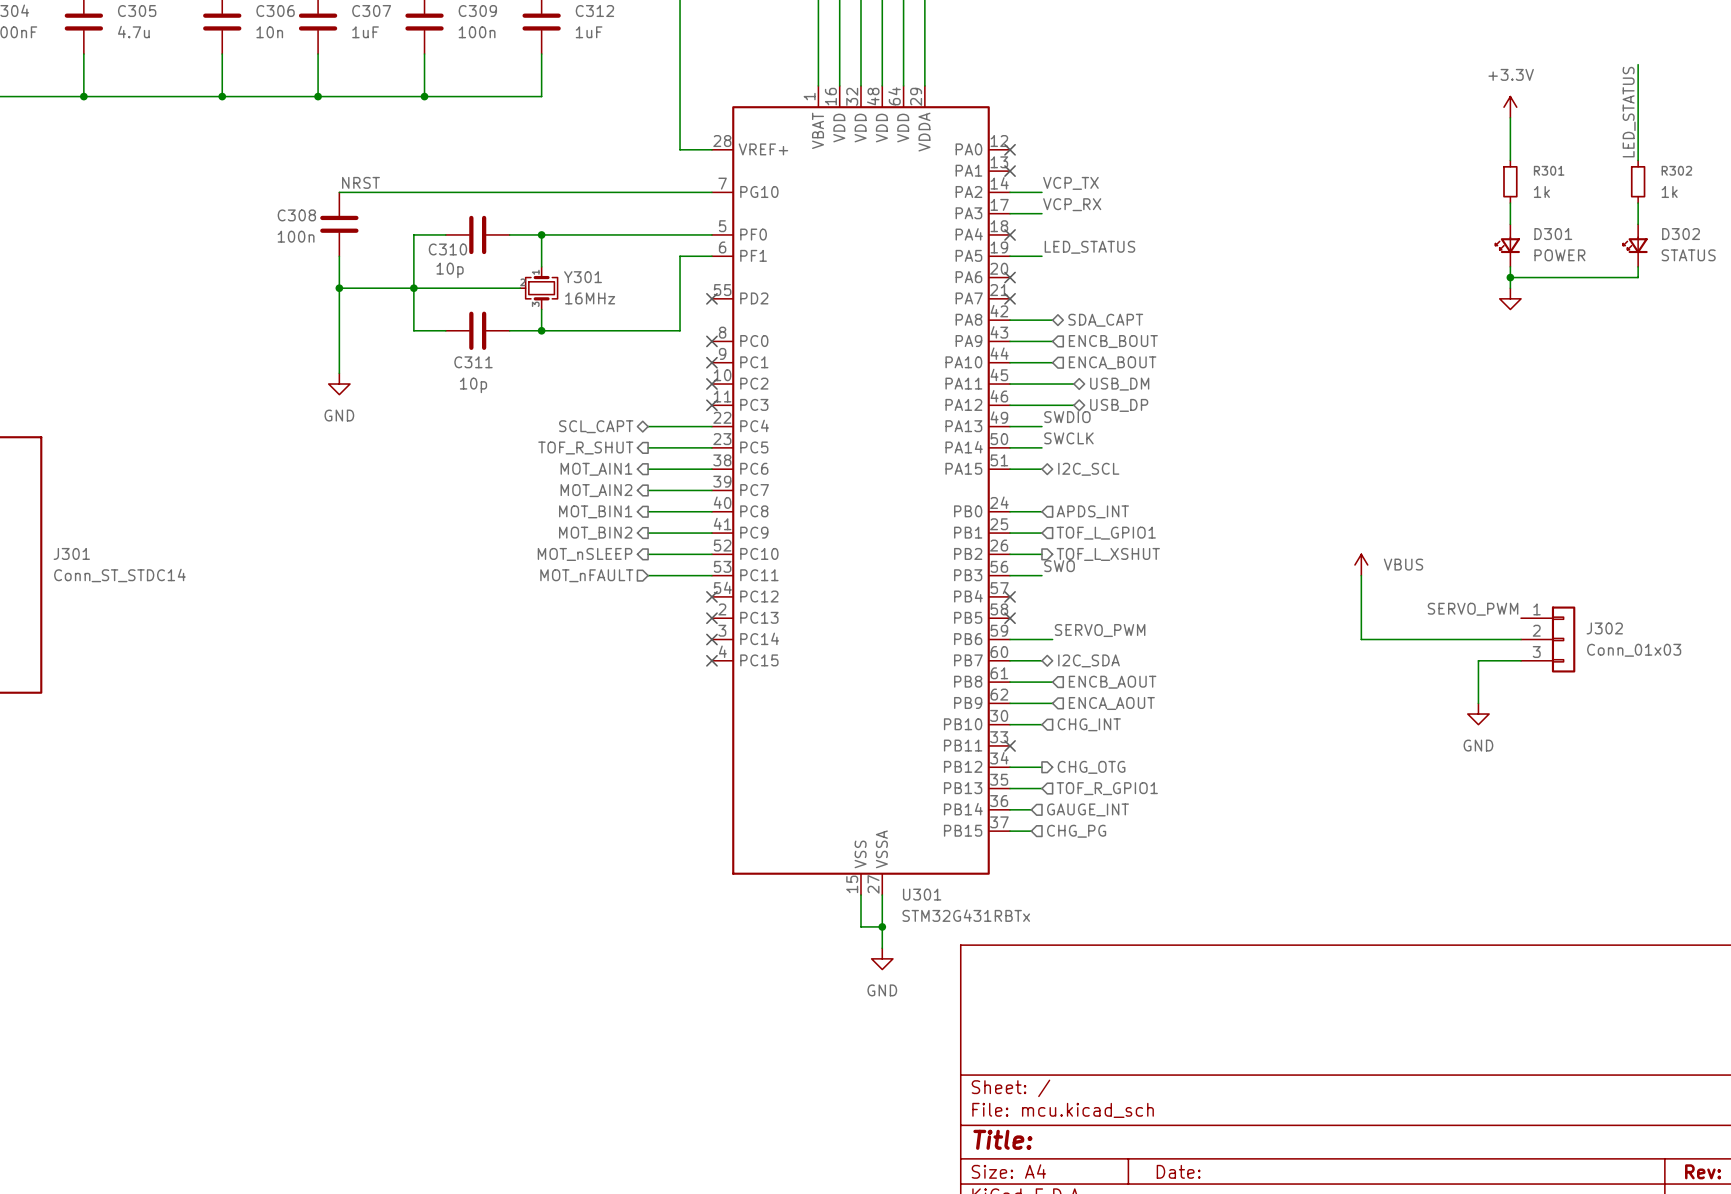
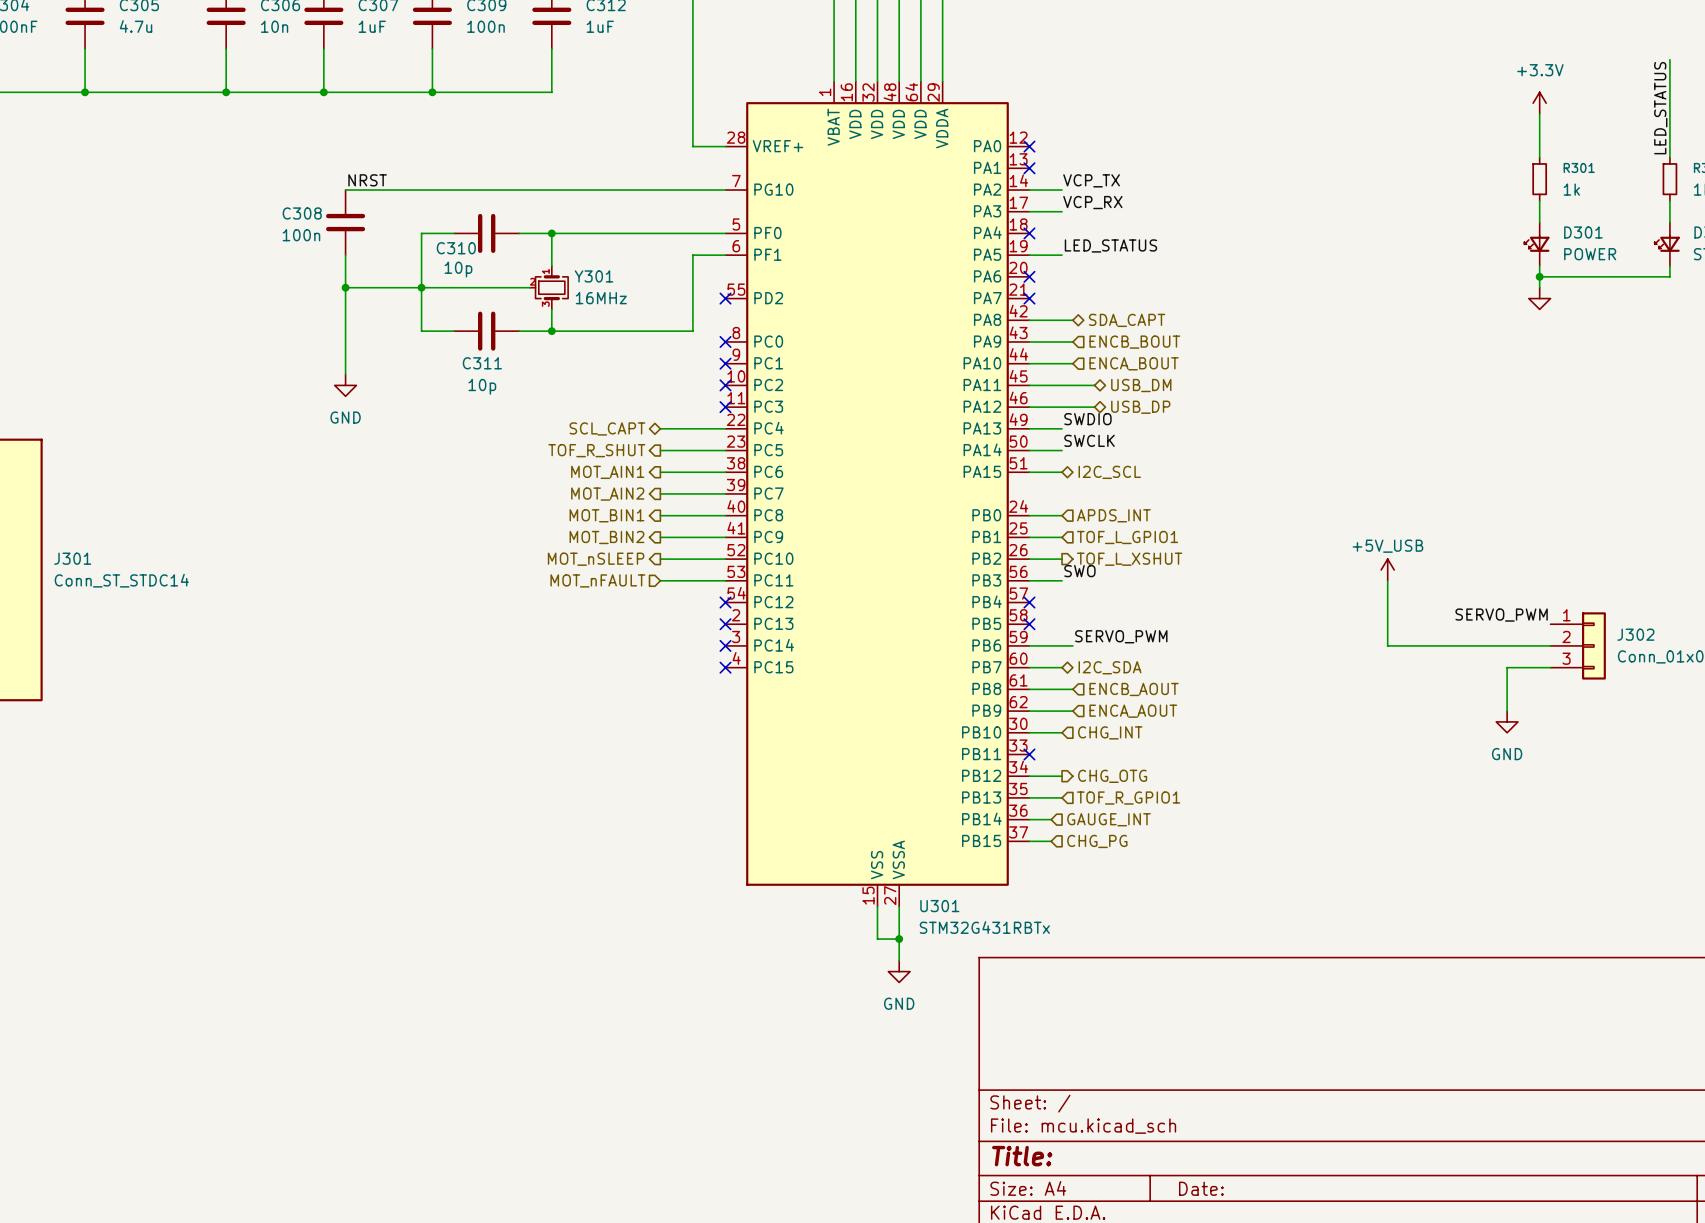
power symbol: VBUS (1361, 564) -> +5V_USB (1387, 569)

